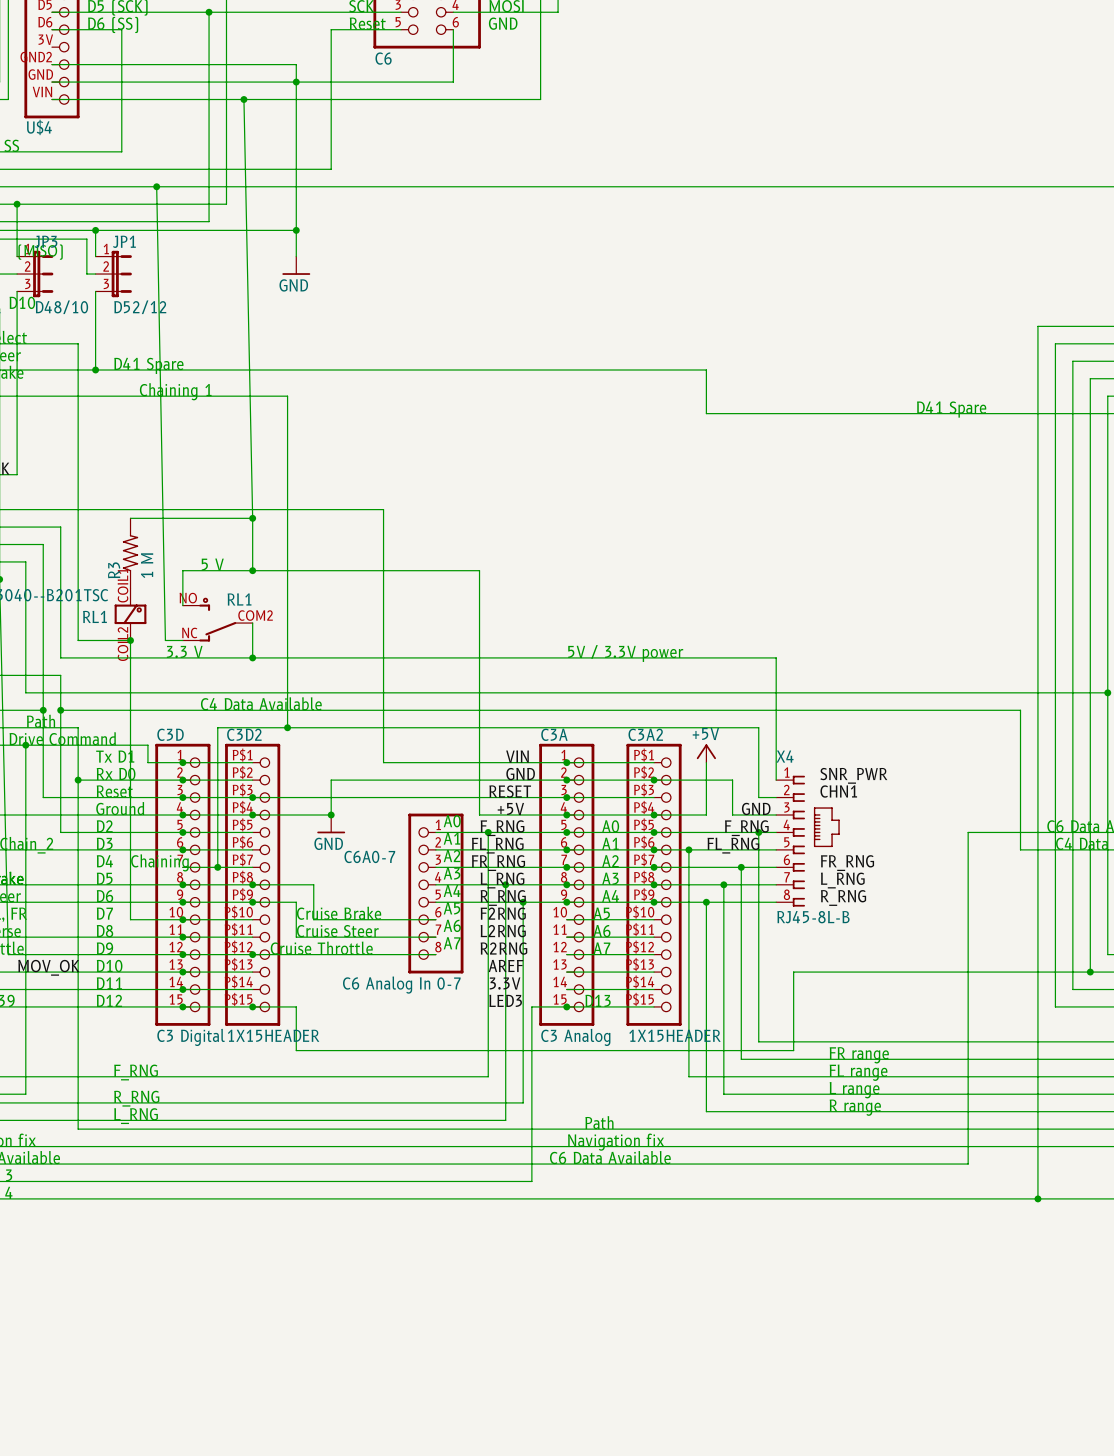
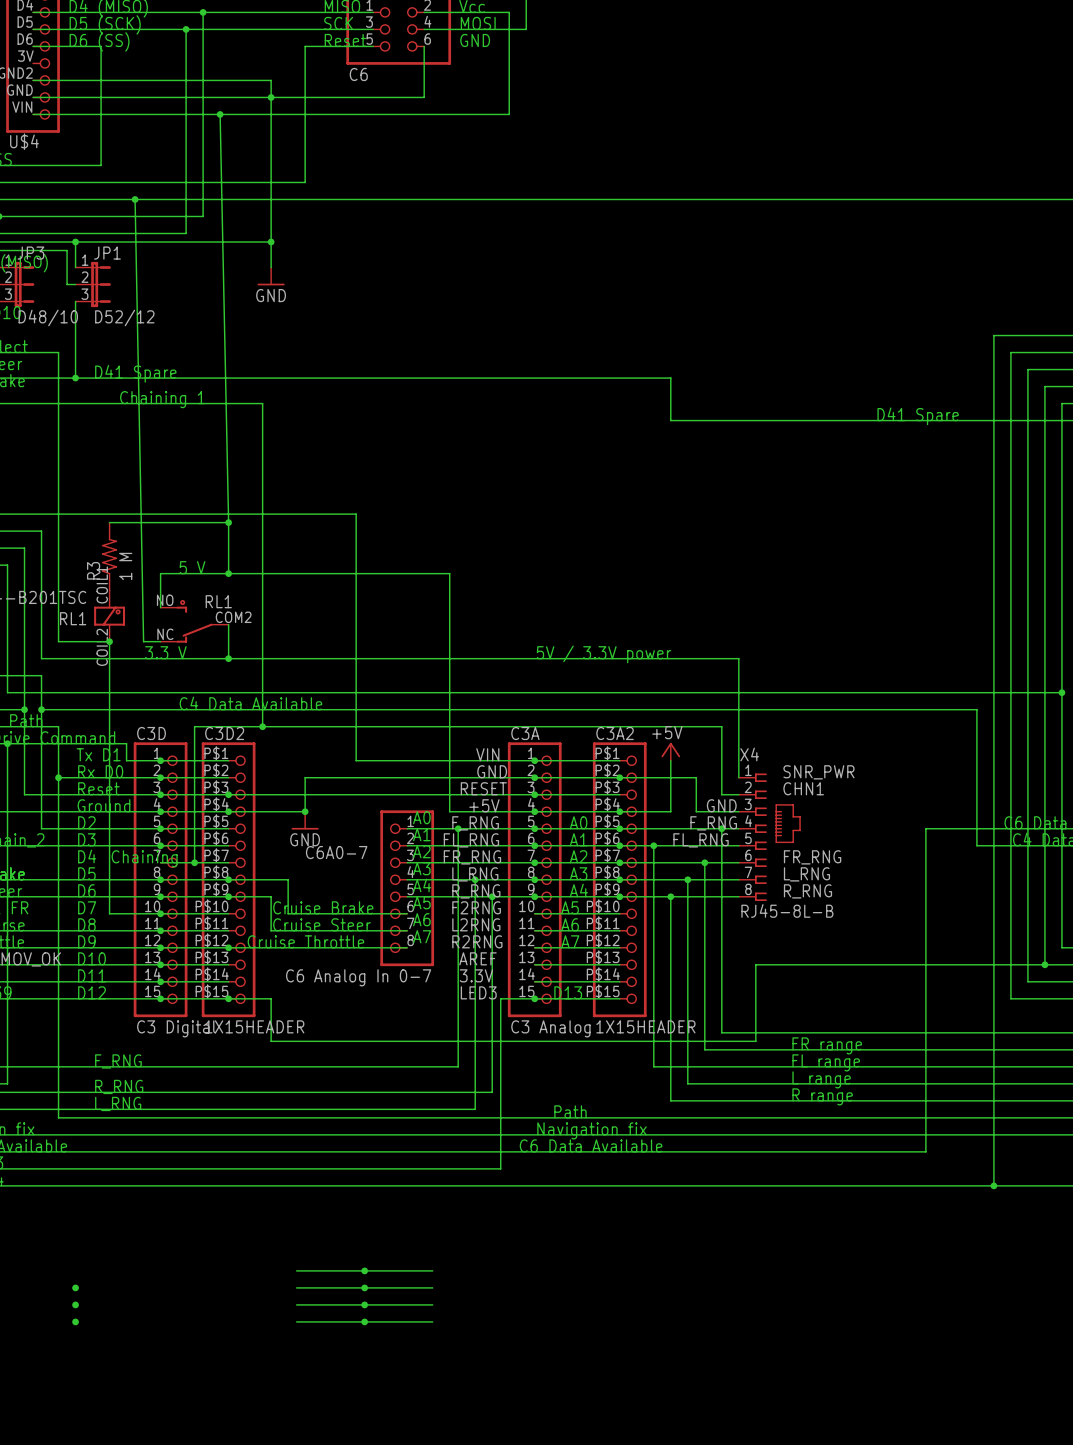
wire: none -> (296, 1270) (432, 1270)
junction: none -> (364, 1270)
junction: none -> (75, 1287)
wire: none -> (296, 1287) (432, 1287)
junction: none -> (364, 1287)
junction: none -> (75, 1304)
wire: none -> (296, 1304) (432, 1304)
junction: none -> (364, 1304)
junction: none -> (75, 1321)
wire: none -> (296, 1321) (432, 1321)
junction: none -> (364, 1321)

